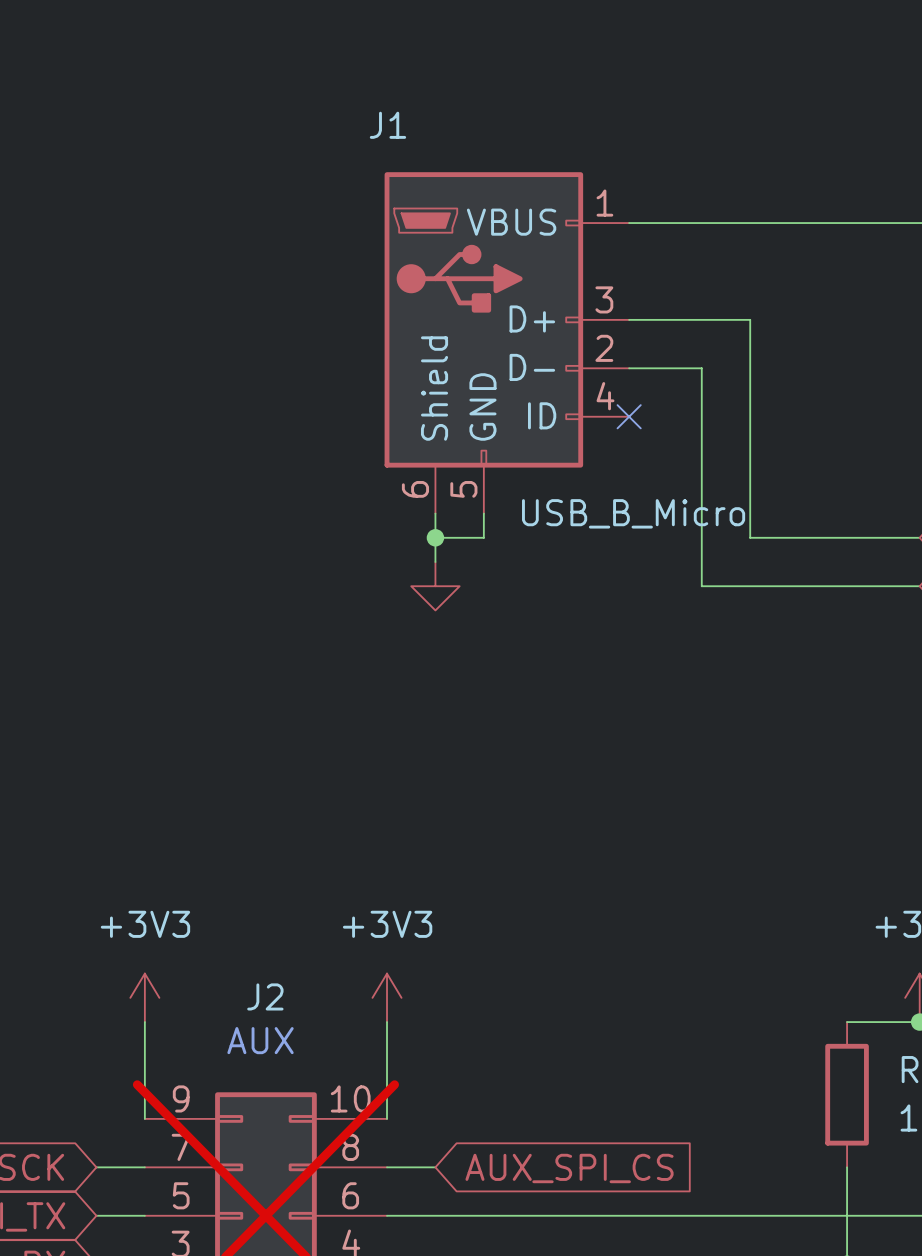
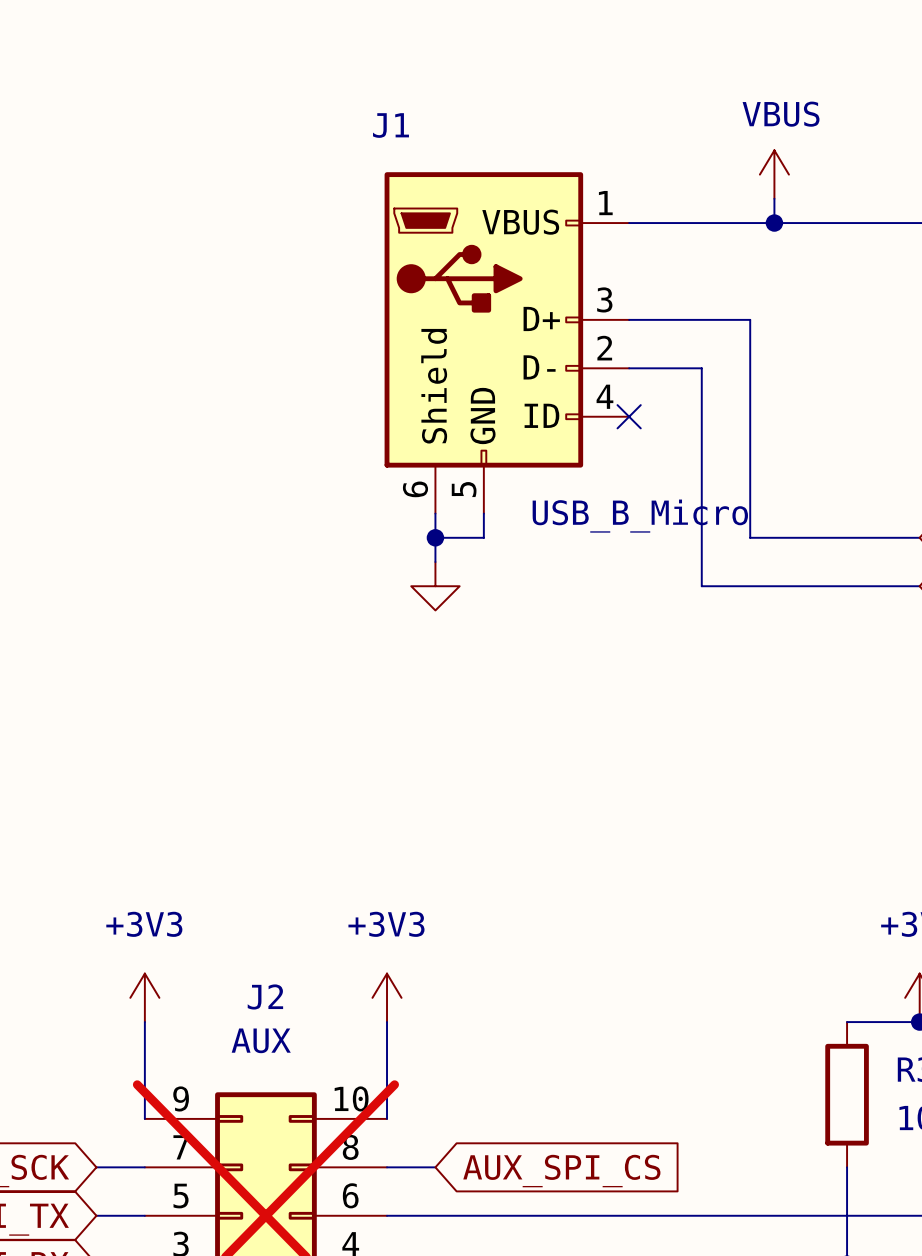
power symbol: none -> VBUS (774, 174)
wire: none -> (774, 198) (774, 223)
junction: none -> (774, 223)

